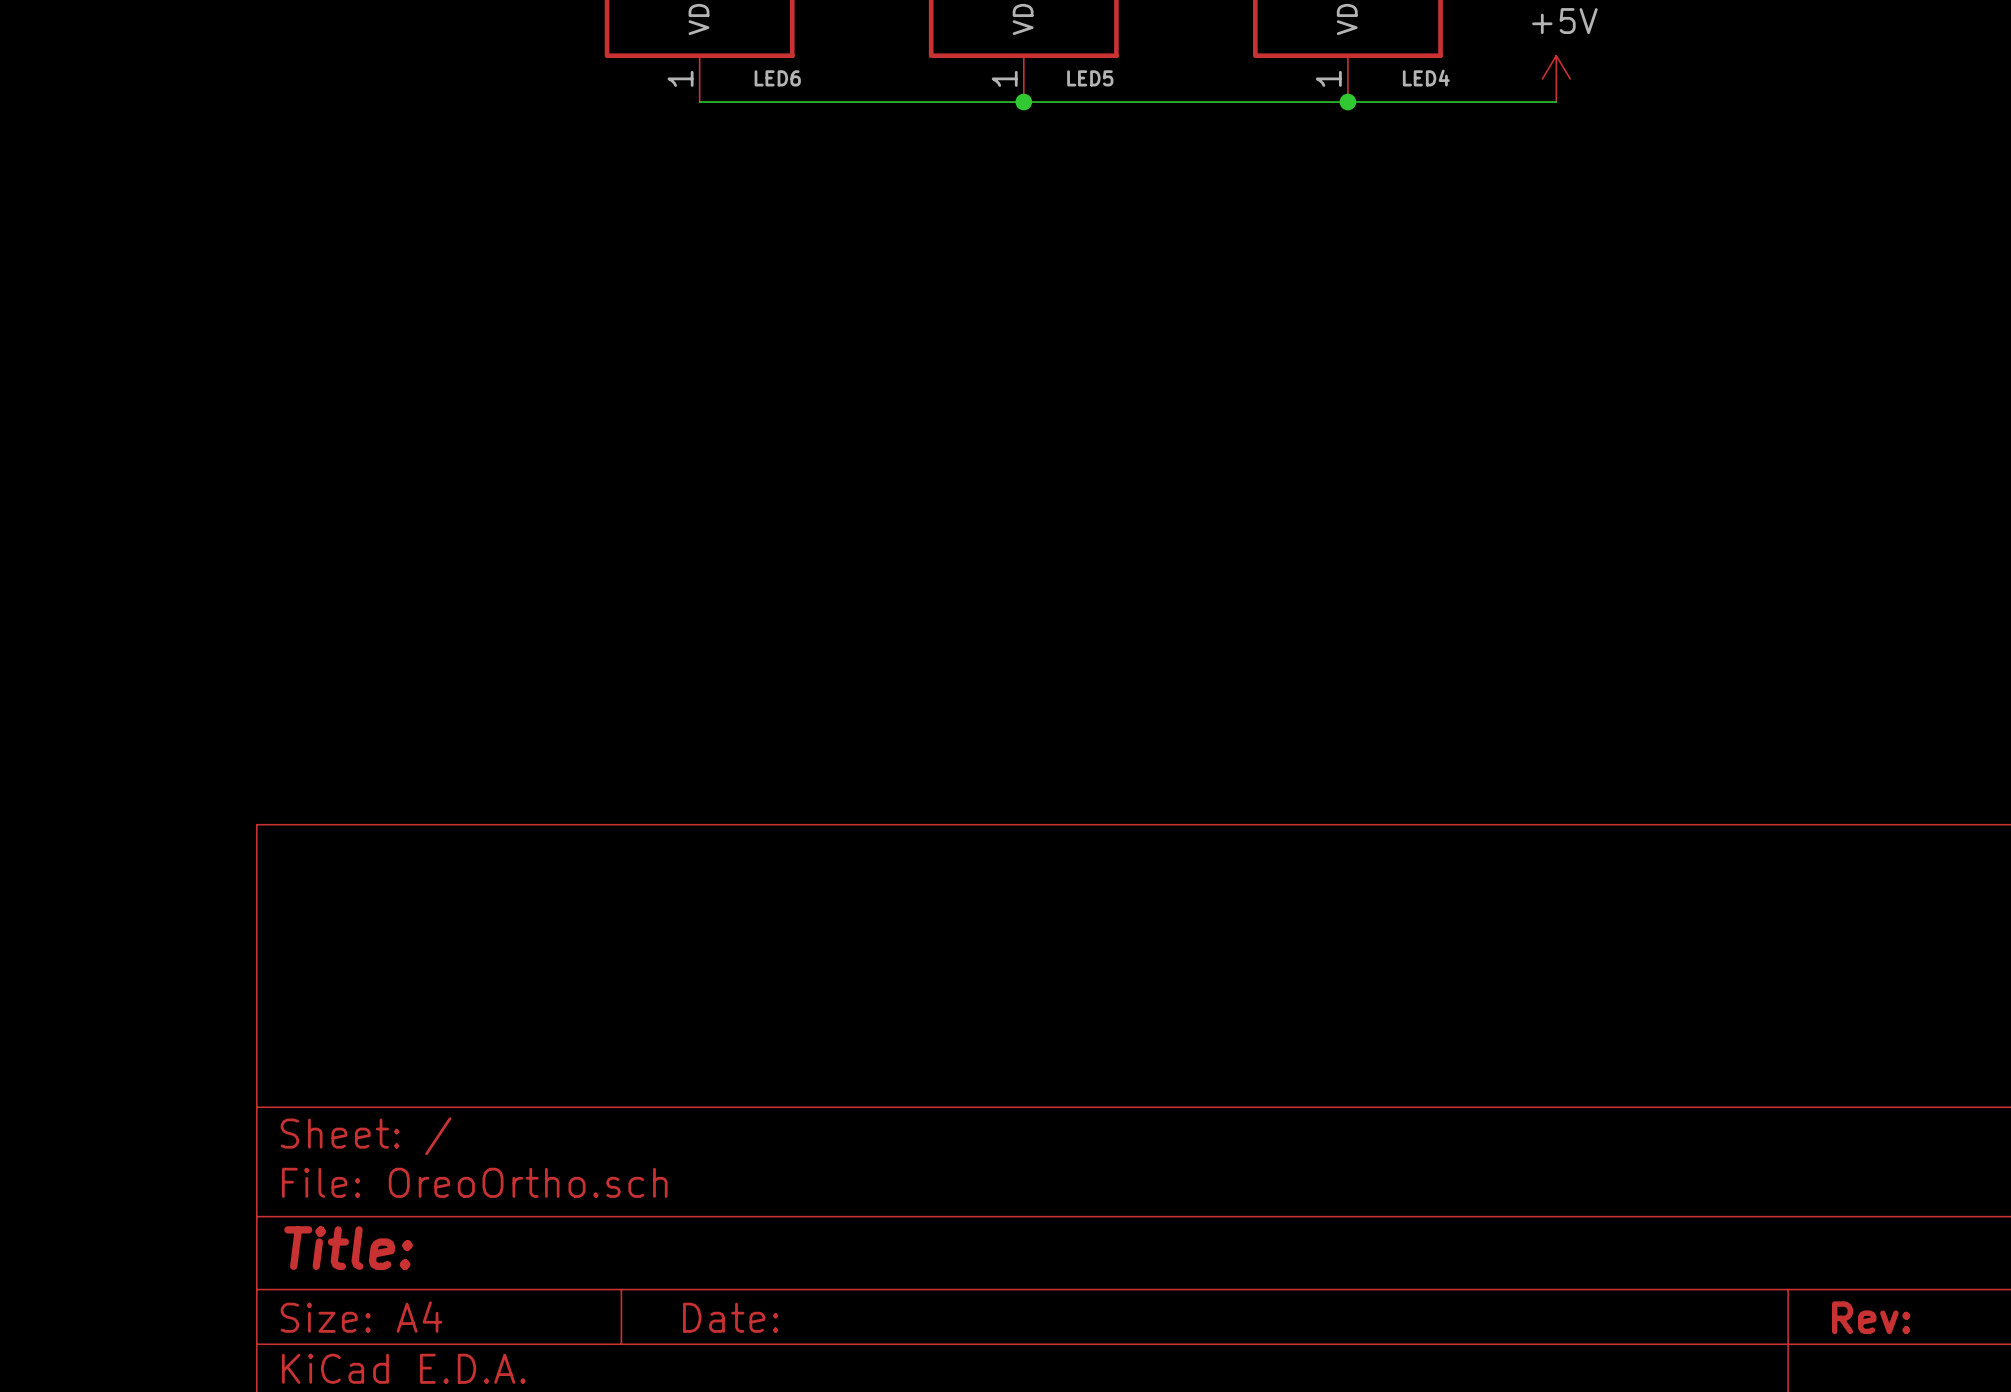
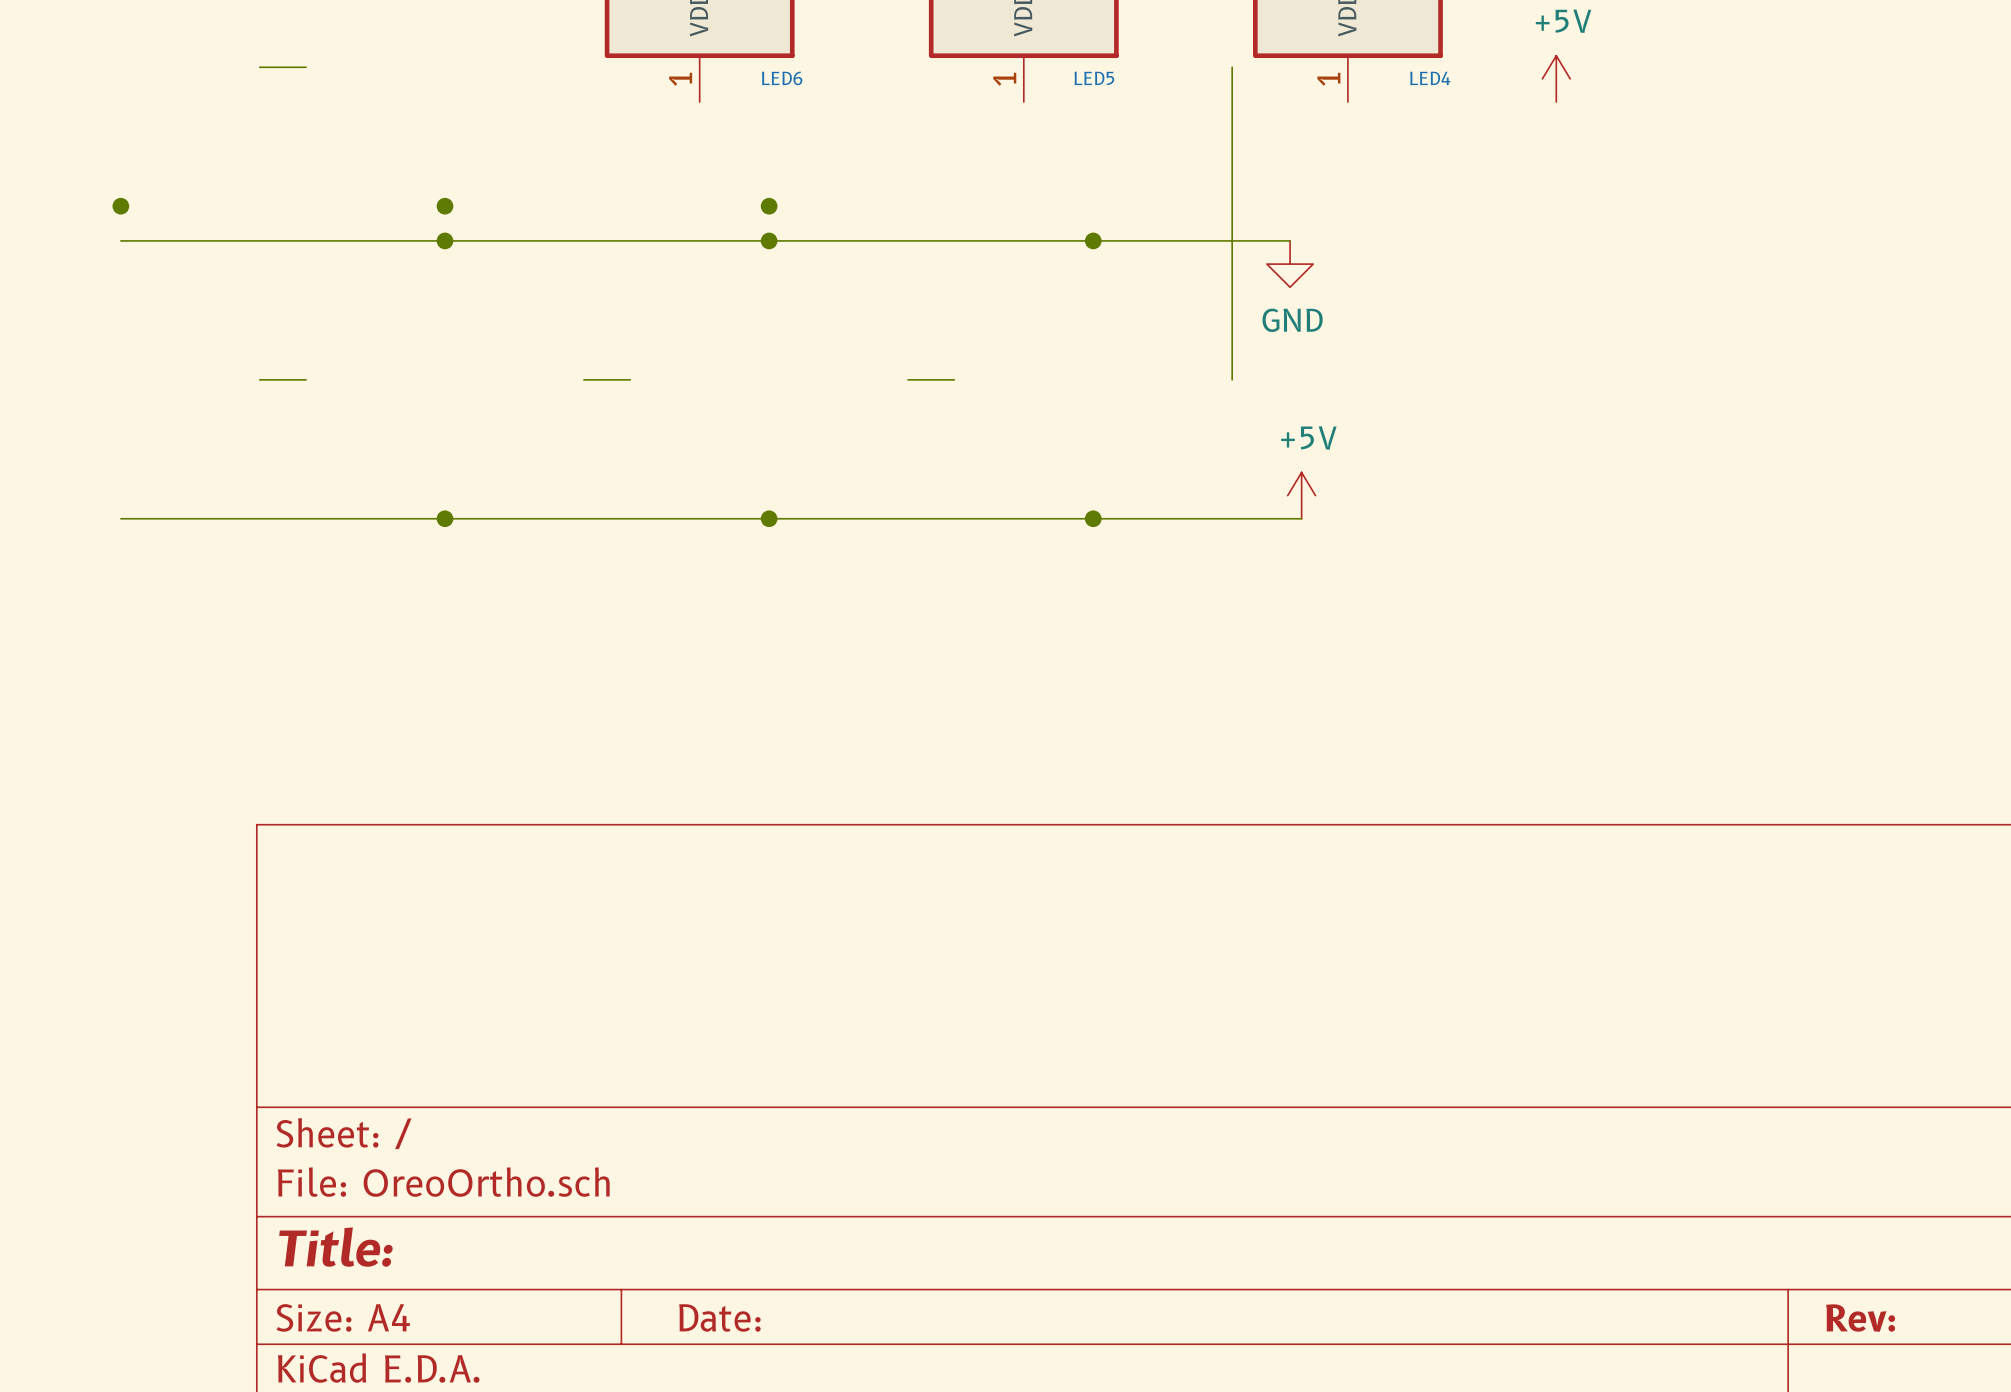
wire: none -> (259, 67) (306, 67)
wire: none -> (1232, 67) (1232, 379)
wire: (699, 102) (1556, 102) -> none
junction: (1023, 102) -> none
junction: (1347, 102) -> none
junction: none -> (120, 206)
junction: none -> (444, 206)
junction: none -> (769, 206)
wire: none -> (120, 240) (1290, 240)
junction: none -> (444, 240)
junction: none -> (769, 240)
junction: none -> (1093, 240)
power symbol: none -> GND (1290, 264)
wire: none -> (259, 379) (306, 379)
wire: none -> (583, 379) (630, 379)
wire: none -> (908, 379) (954, 379)
power symbol: none -> +5V (1301, 495)
wire: none -> (120, 518) (1301, 518)
junction: none -> (444, 518)
junction: none -> (769, 518)
junction: none -> (1093, 518)

